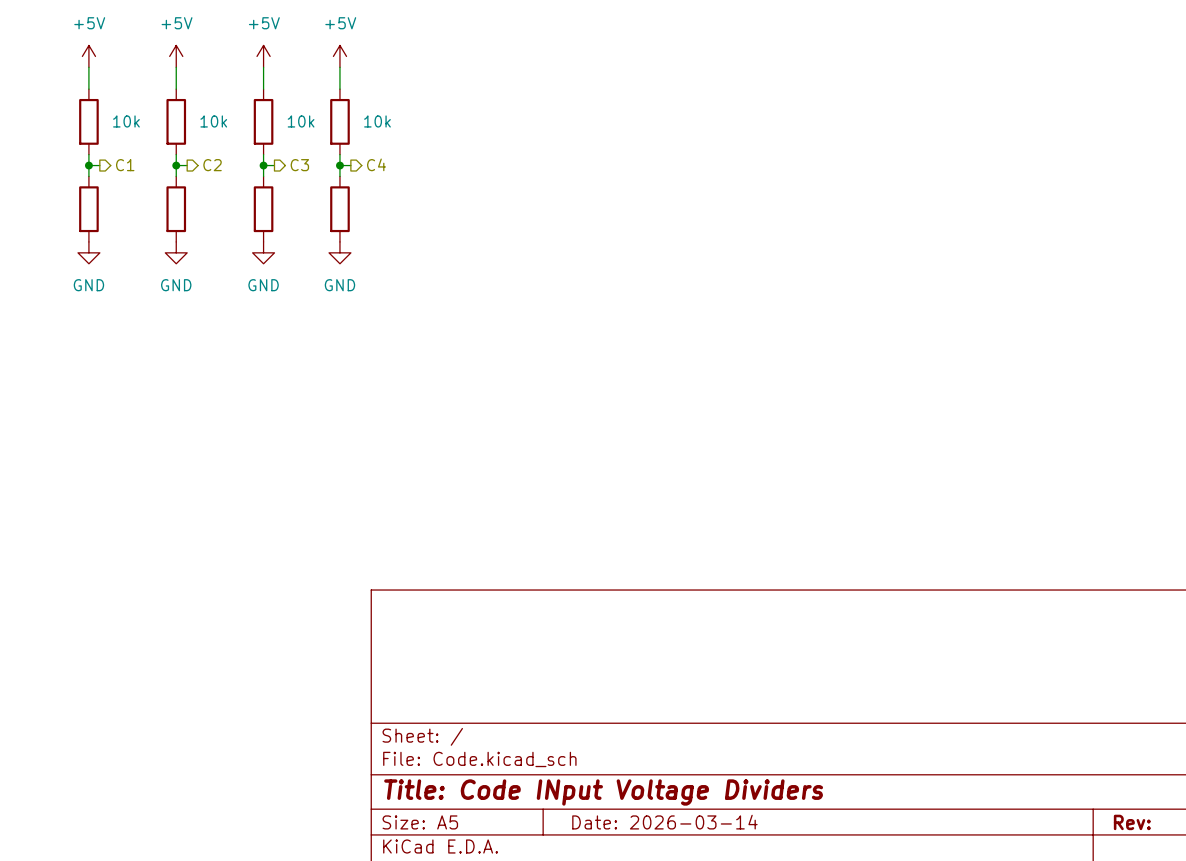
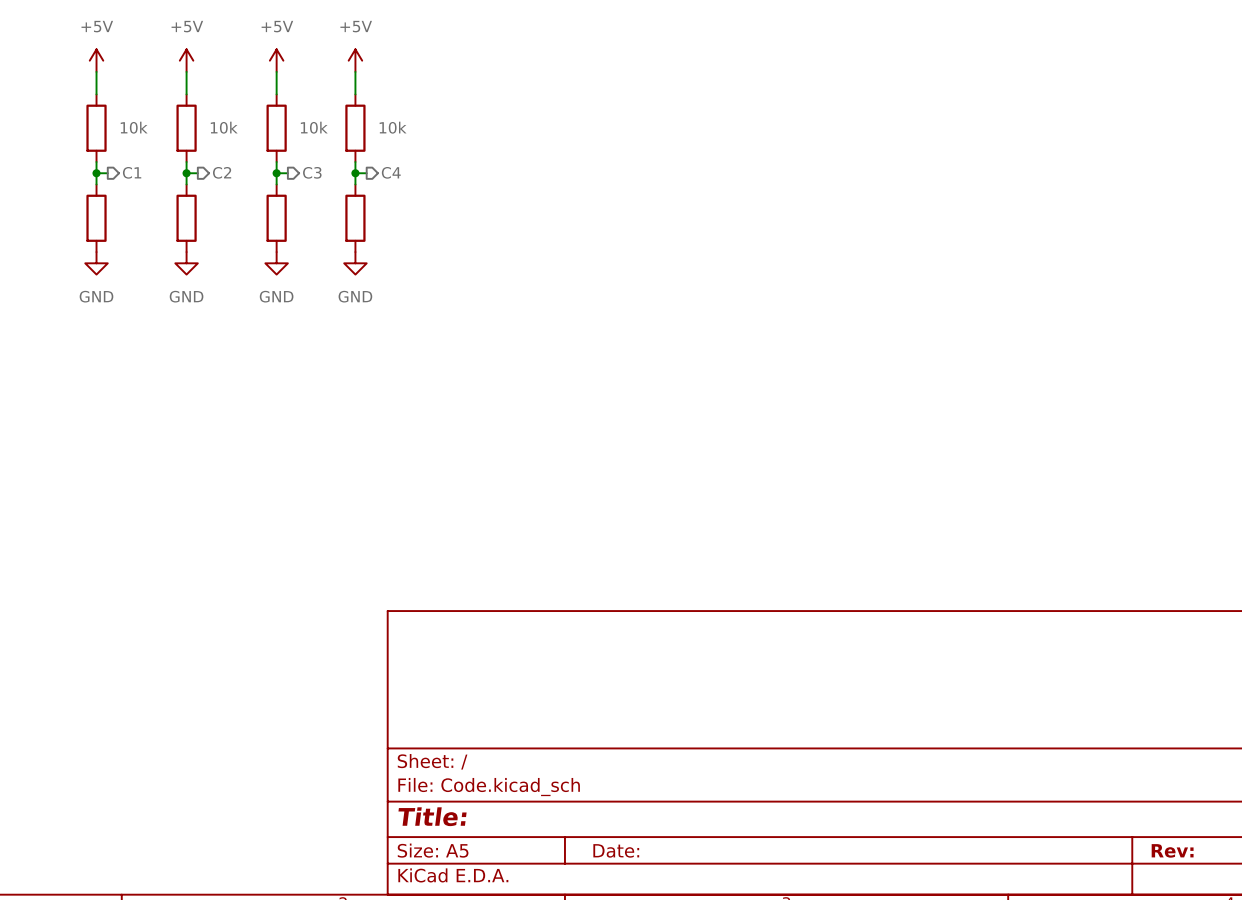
title block: Title: Code INput Voltage Dividers (603, 792) -> Title: (432, 816)
title block: Date: 2026-03-14 (664, 822) -> Date: (616, 850)

